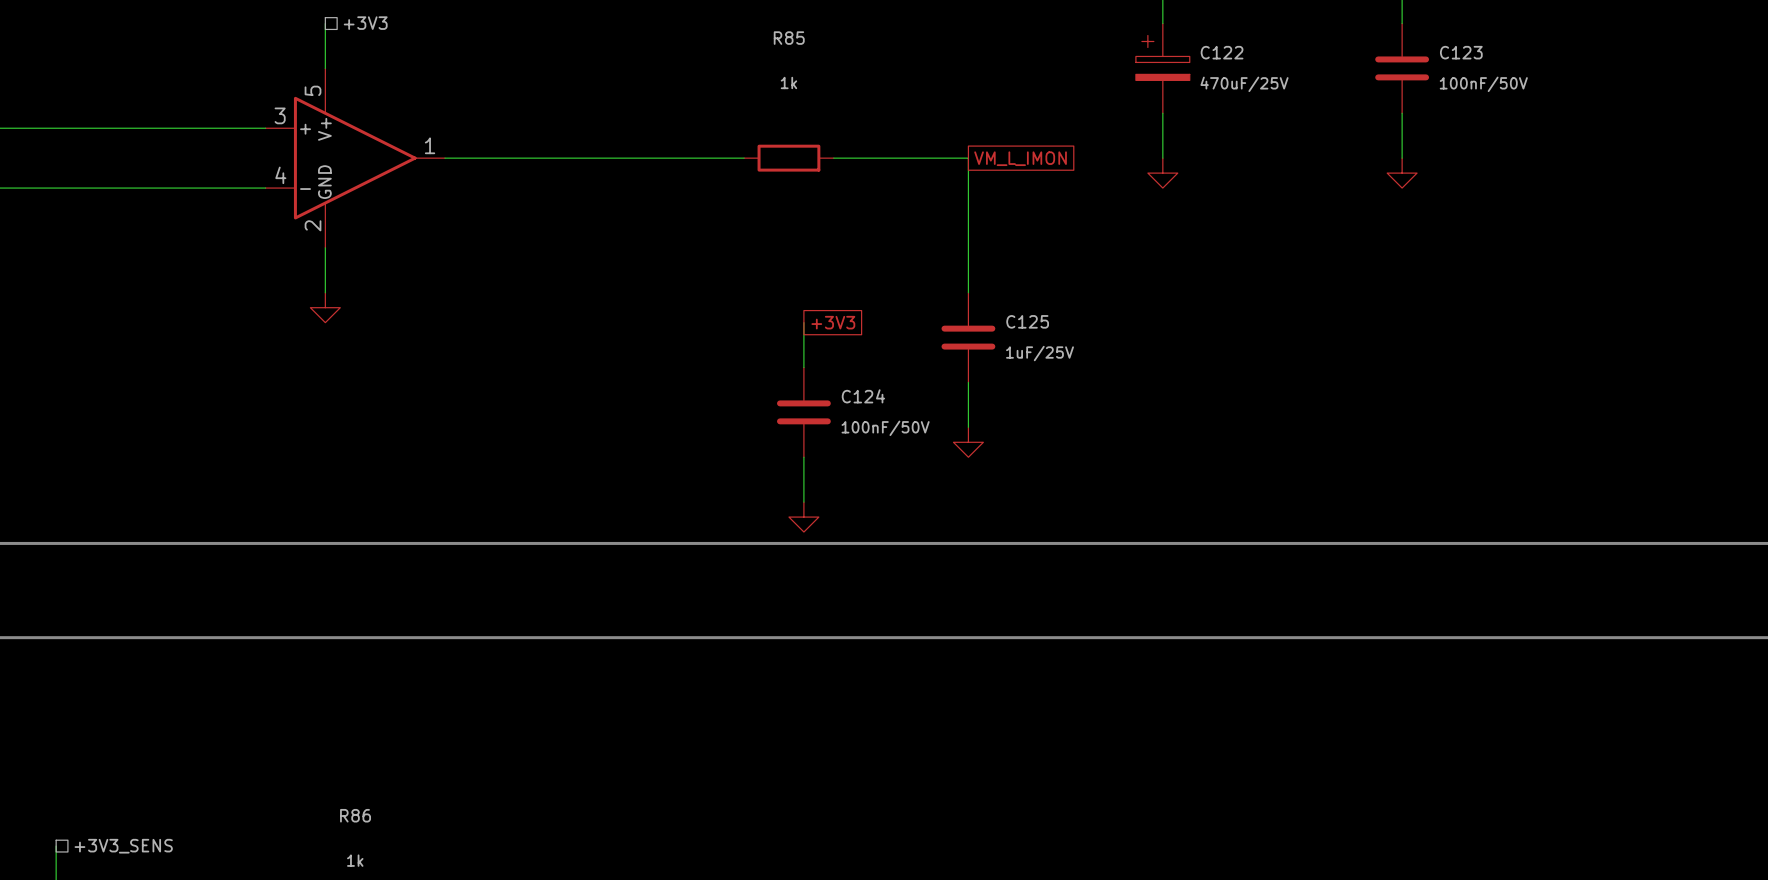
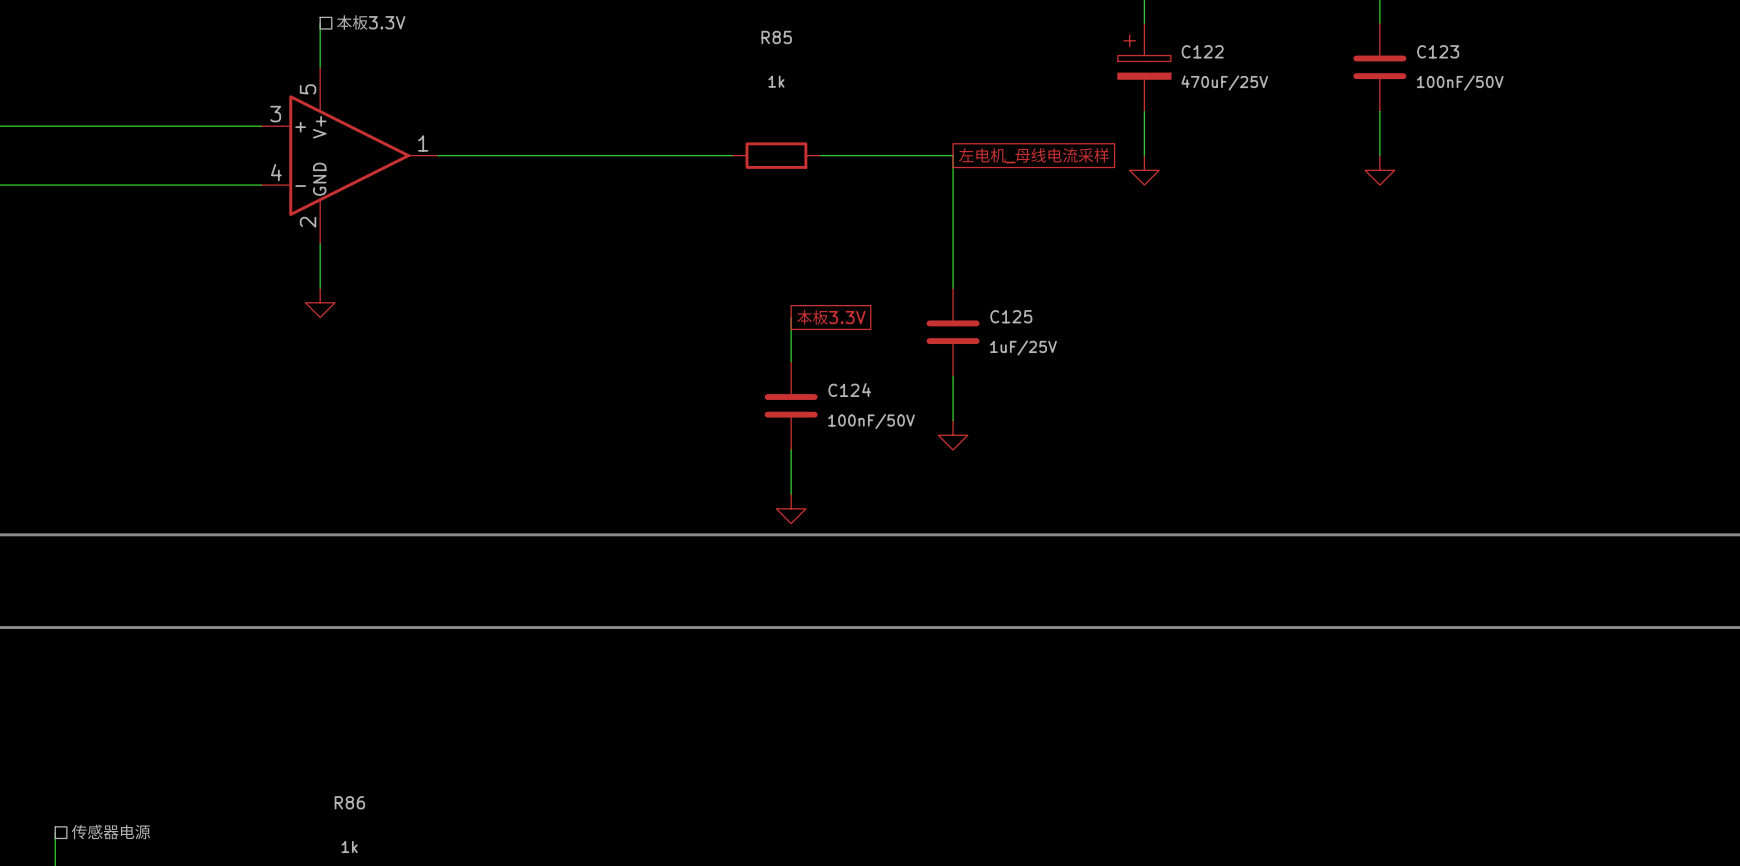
hierarchical label: +3V3 (365, 23) -> 本板3.3V (370, 22)
global label: VM_L_IMON (1020, 158) -> 左电机_母线电流采样 (1033, 155)
global label: +3V3 (833, 322) -> 本板3.3V (830, 317)
hierarchical label: +3V3_SENS (123, 846) -> 传感器电源 (110, 831)

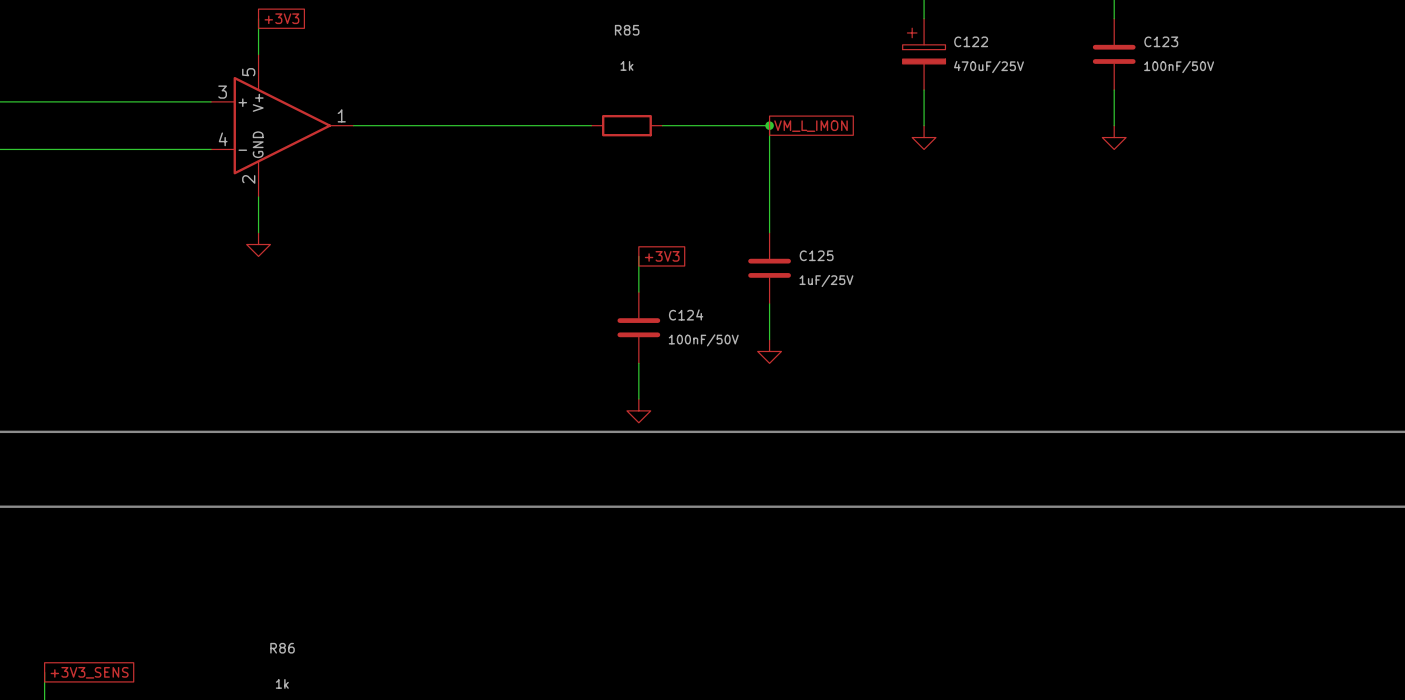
hierarchical label: 本板3.3V (370, 22) -> none
global label: none -> +3V3 (281, 18)
junction: none -> (769, 125)
global label: 左电机_母线电流采样 (1033, 155) -> VM_L_IMON (811, 126)
global label: 本板3.3V (830, 317) -> +3V3 (662, 256)
hierarchical label: 传感器电源 (110, 831) -> none
global label: none -> +3V3_SENS (89, 672)

